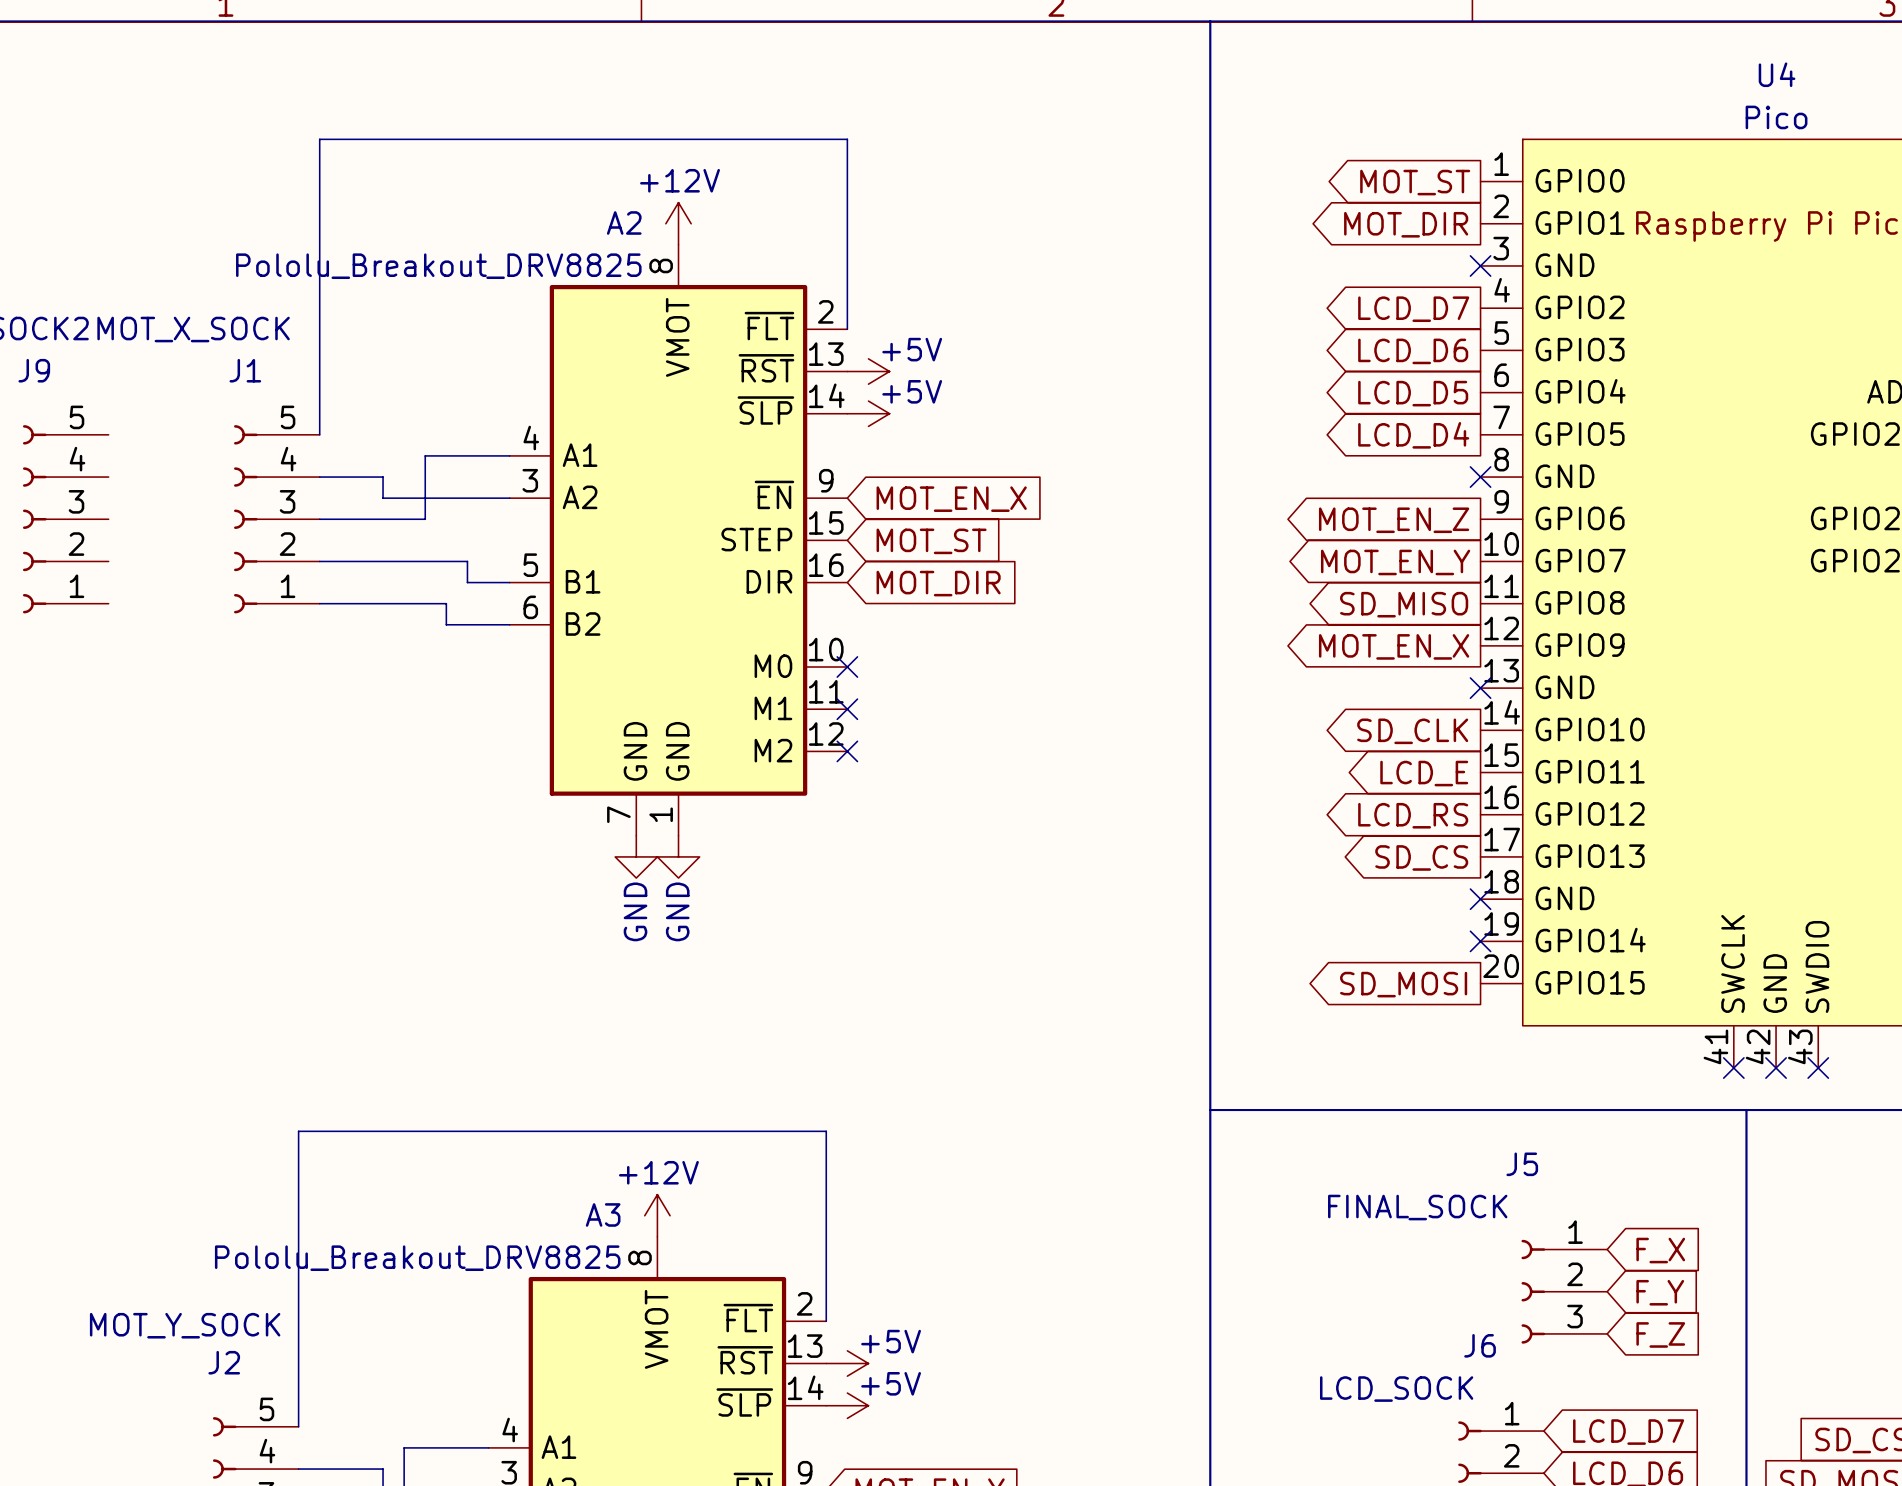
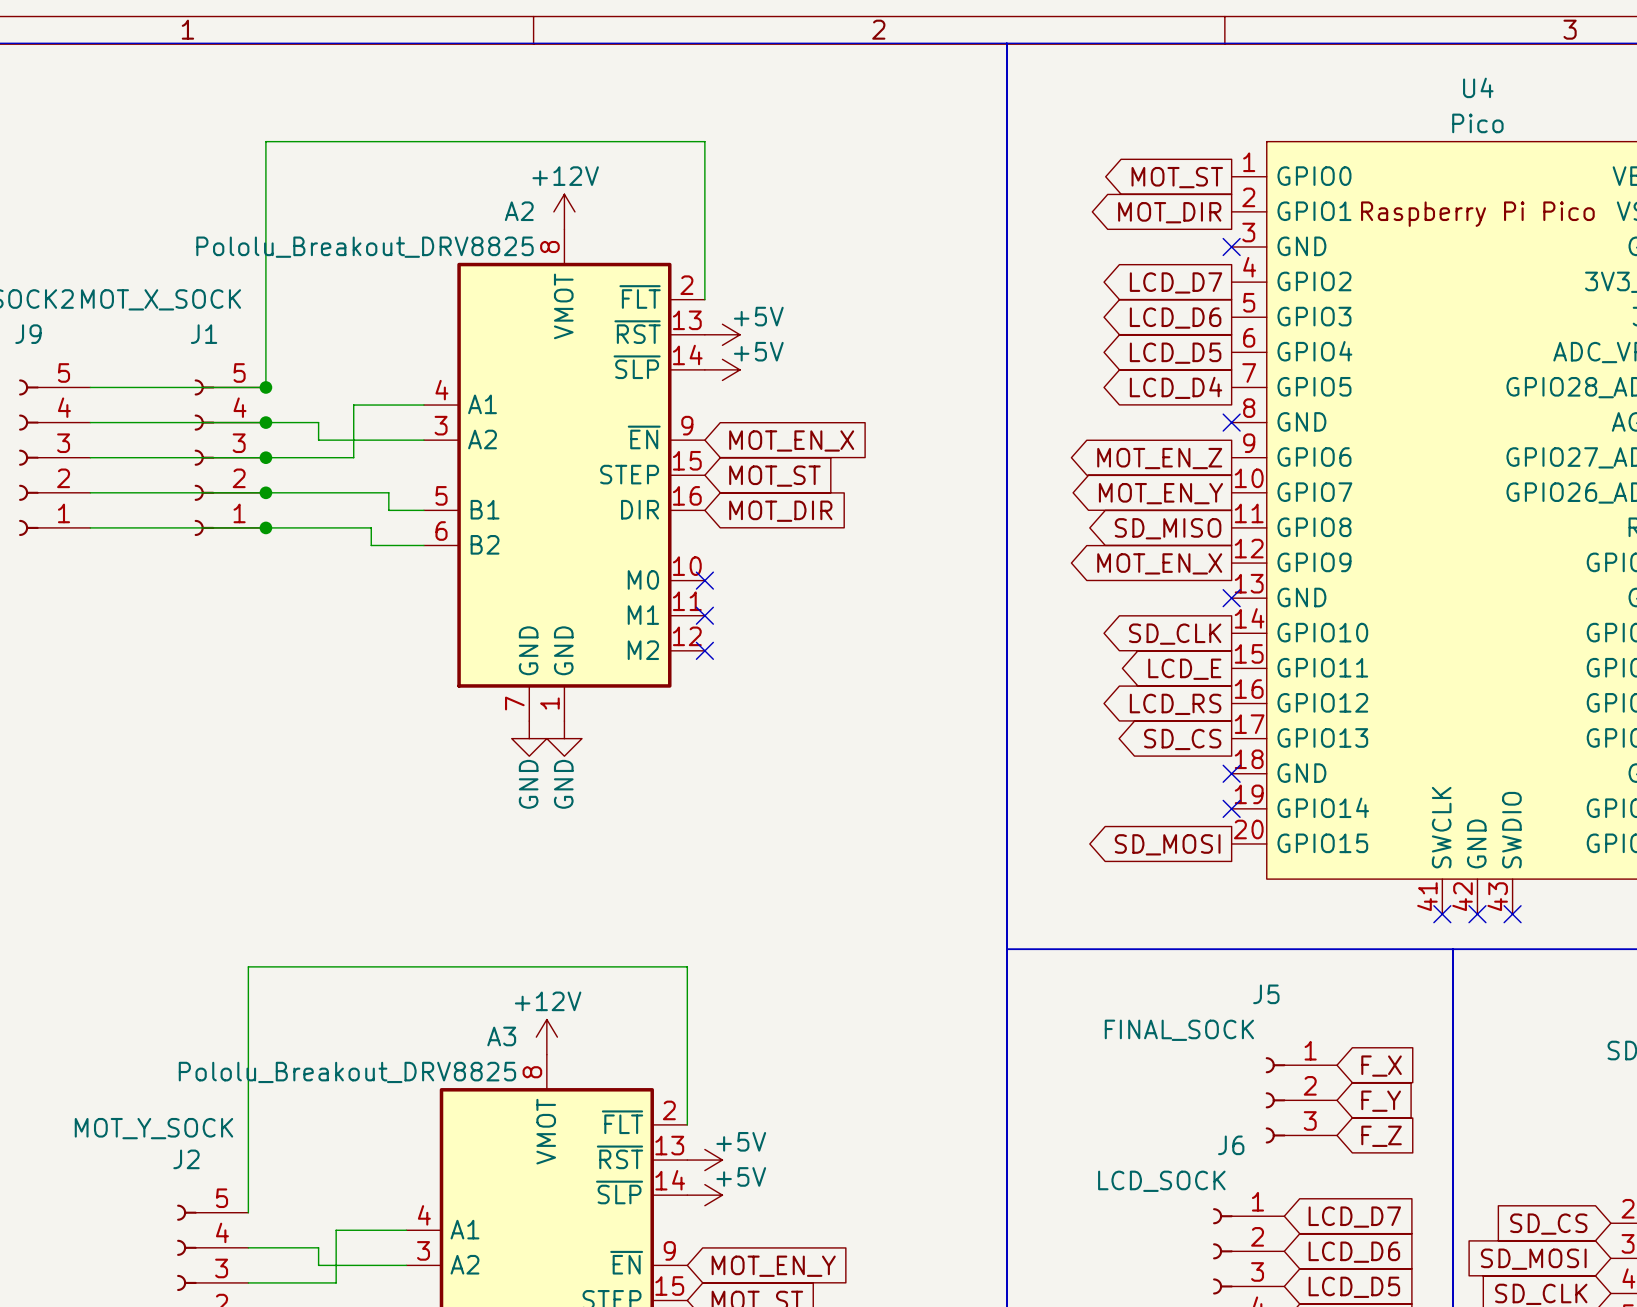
wire: none -> (90, 387) (265, 387)
junction: none -> (265, 387)
wire: none -> (90, 422) (265, 422)
junction: none -> (265, 422)
wire: none -> (90, 457) (265, 457)
junction: none -> (265, 457)
wire: none -> (90, 492) (265, 492)
junction: none -> (265, 492)
wire: none -> (90, 527) (265, 527)
junction: none -> (265, 527)

